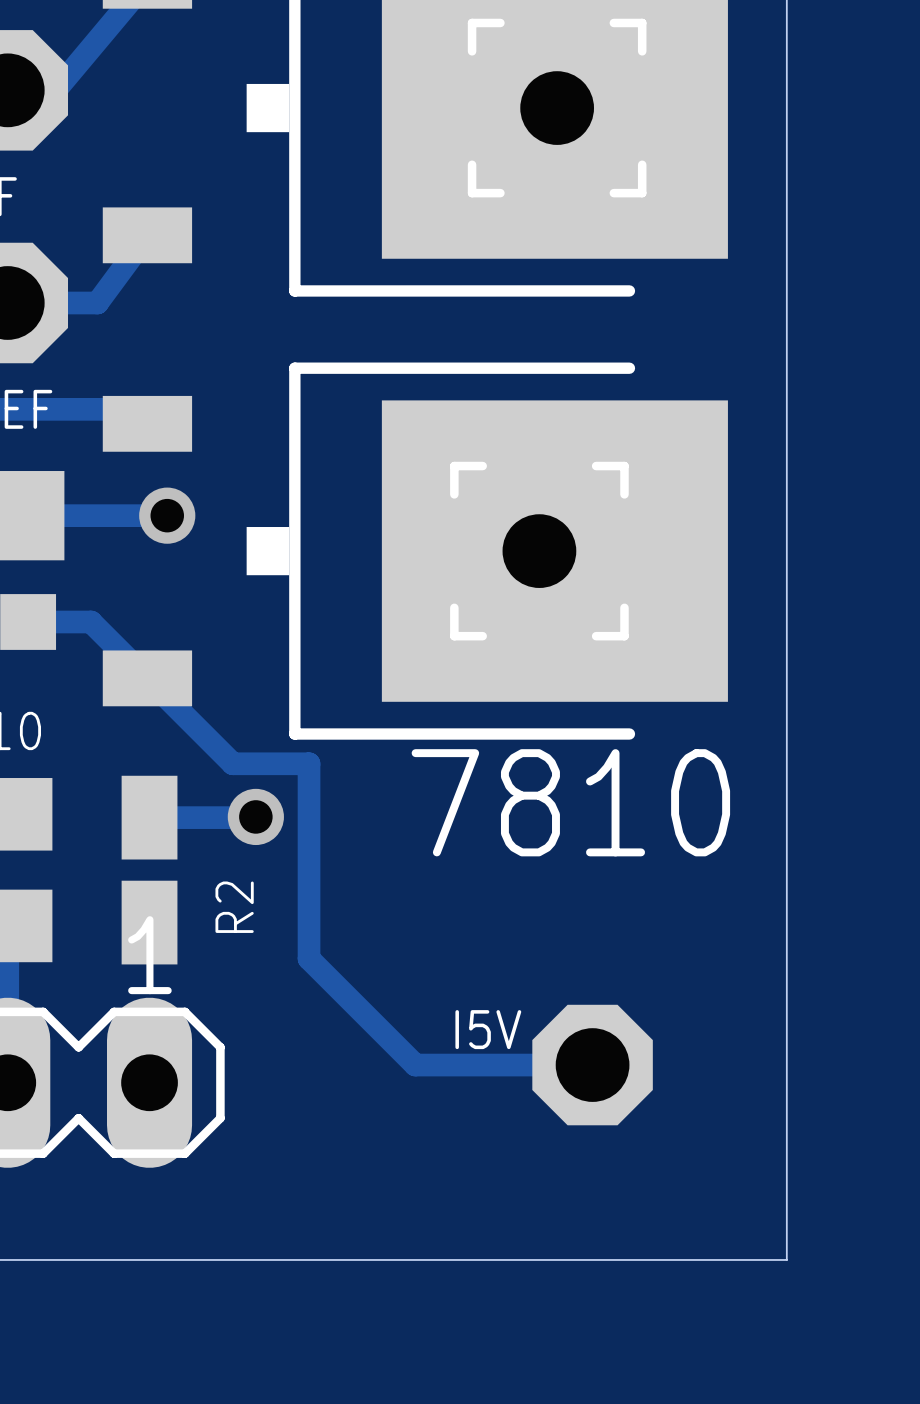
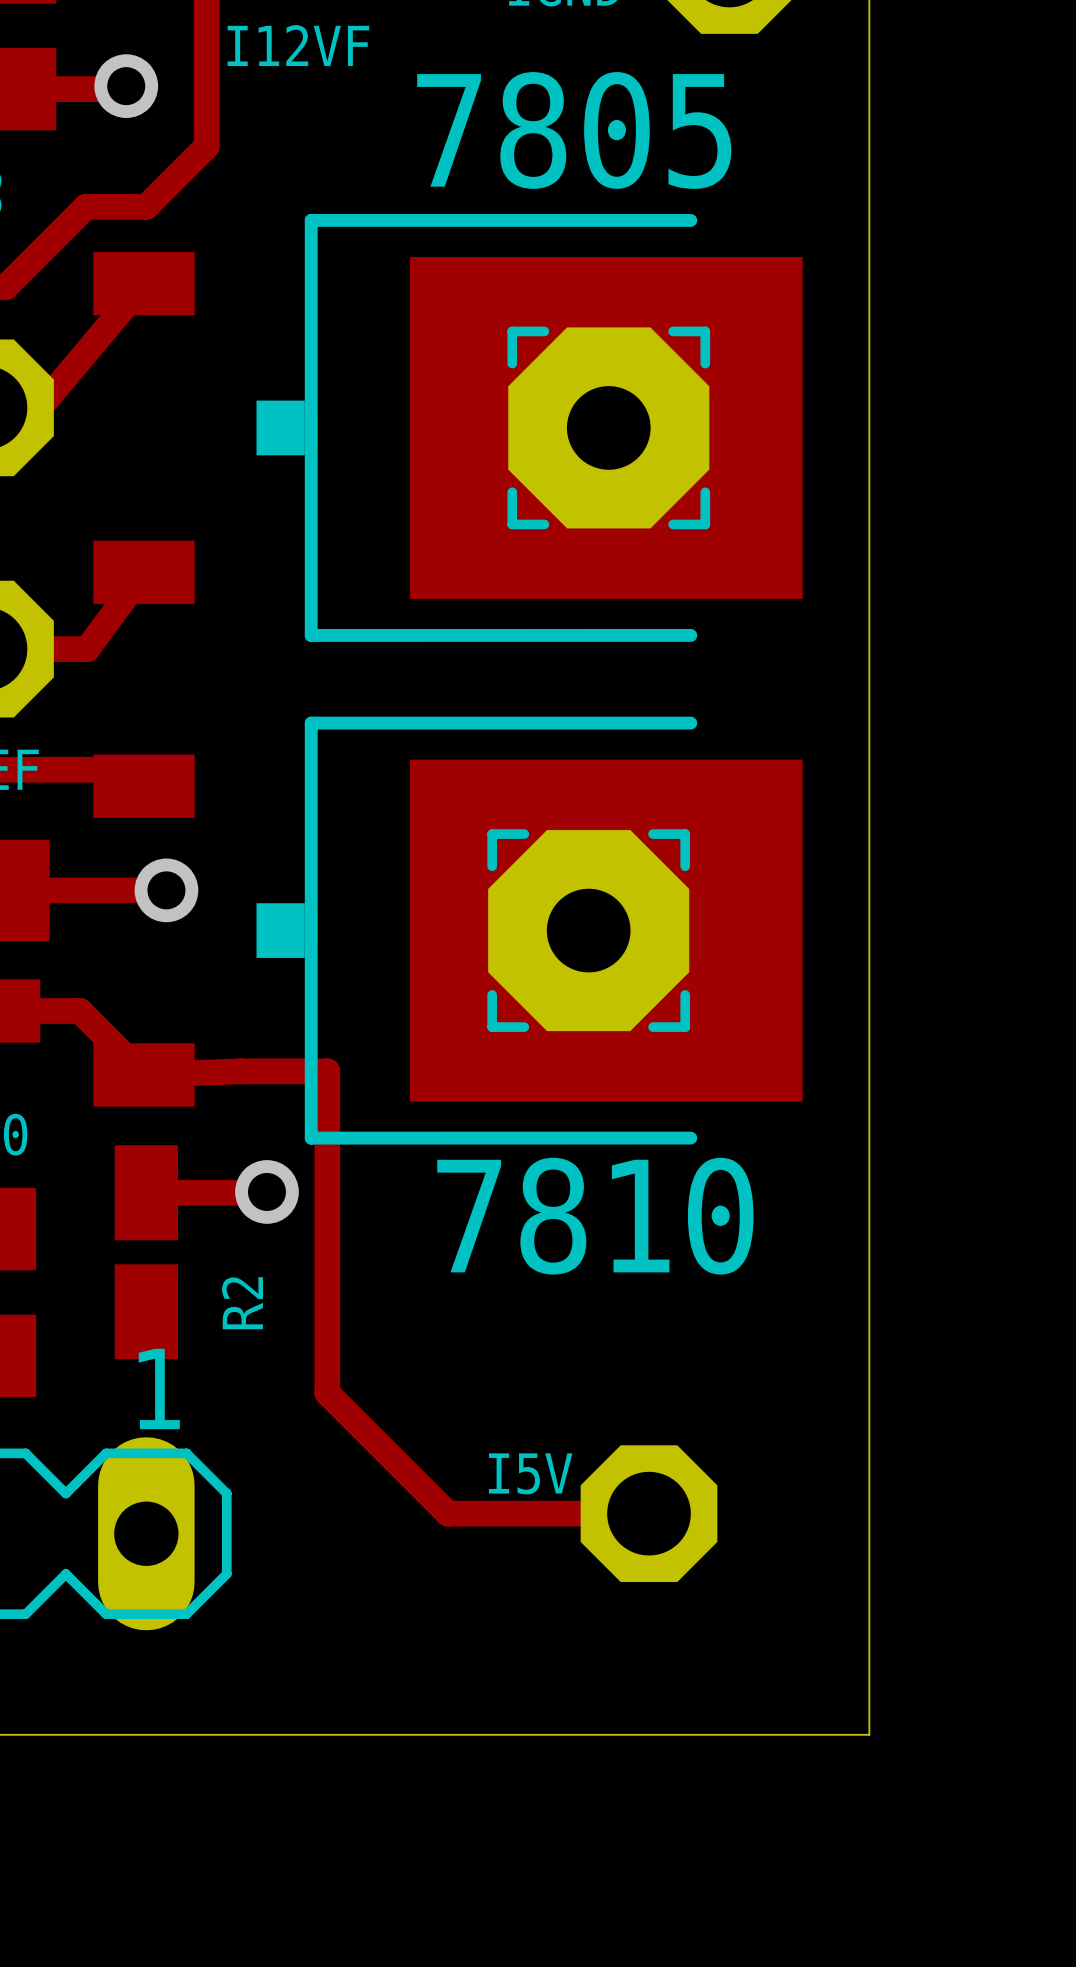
track: (147, 678) (232, 763) (309, 763) -> (143, 1074) (240, 1071) (327, 1071) (327, 1171)
via position: (255, 816) -> (266, 1191)
track: (149, 817) (255, 817) -> (146, 1192) (266, 1192)
R2 position: (149, 870) -> (146, 1252)

